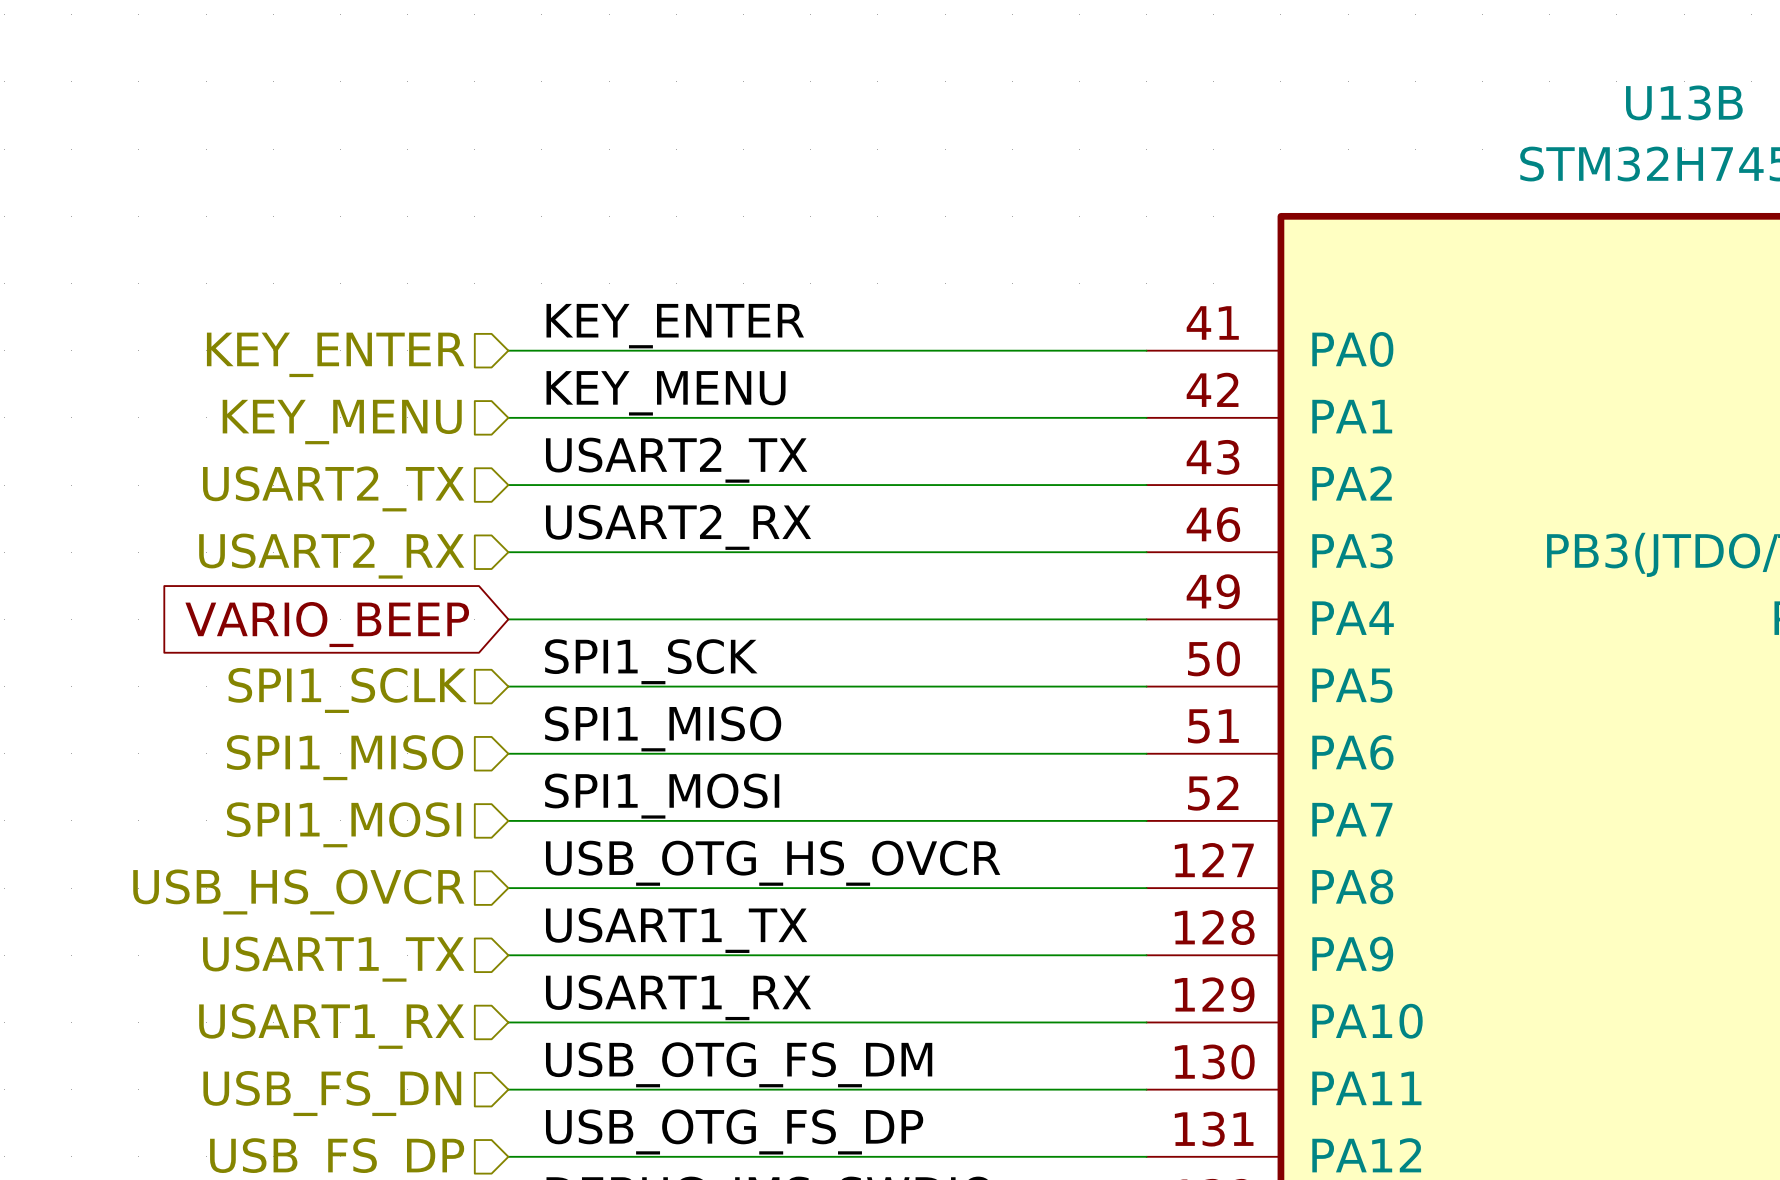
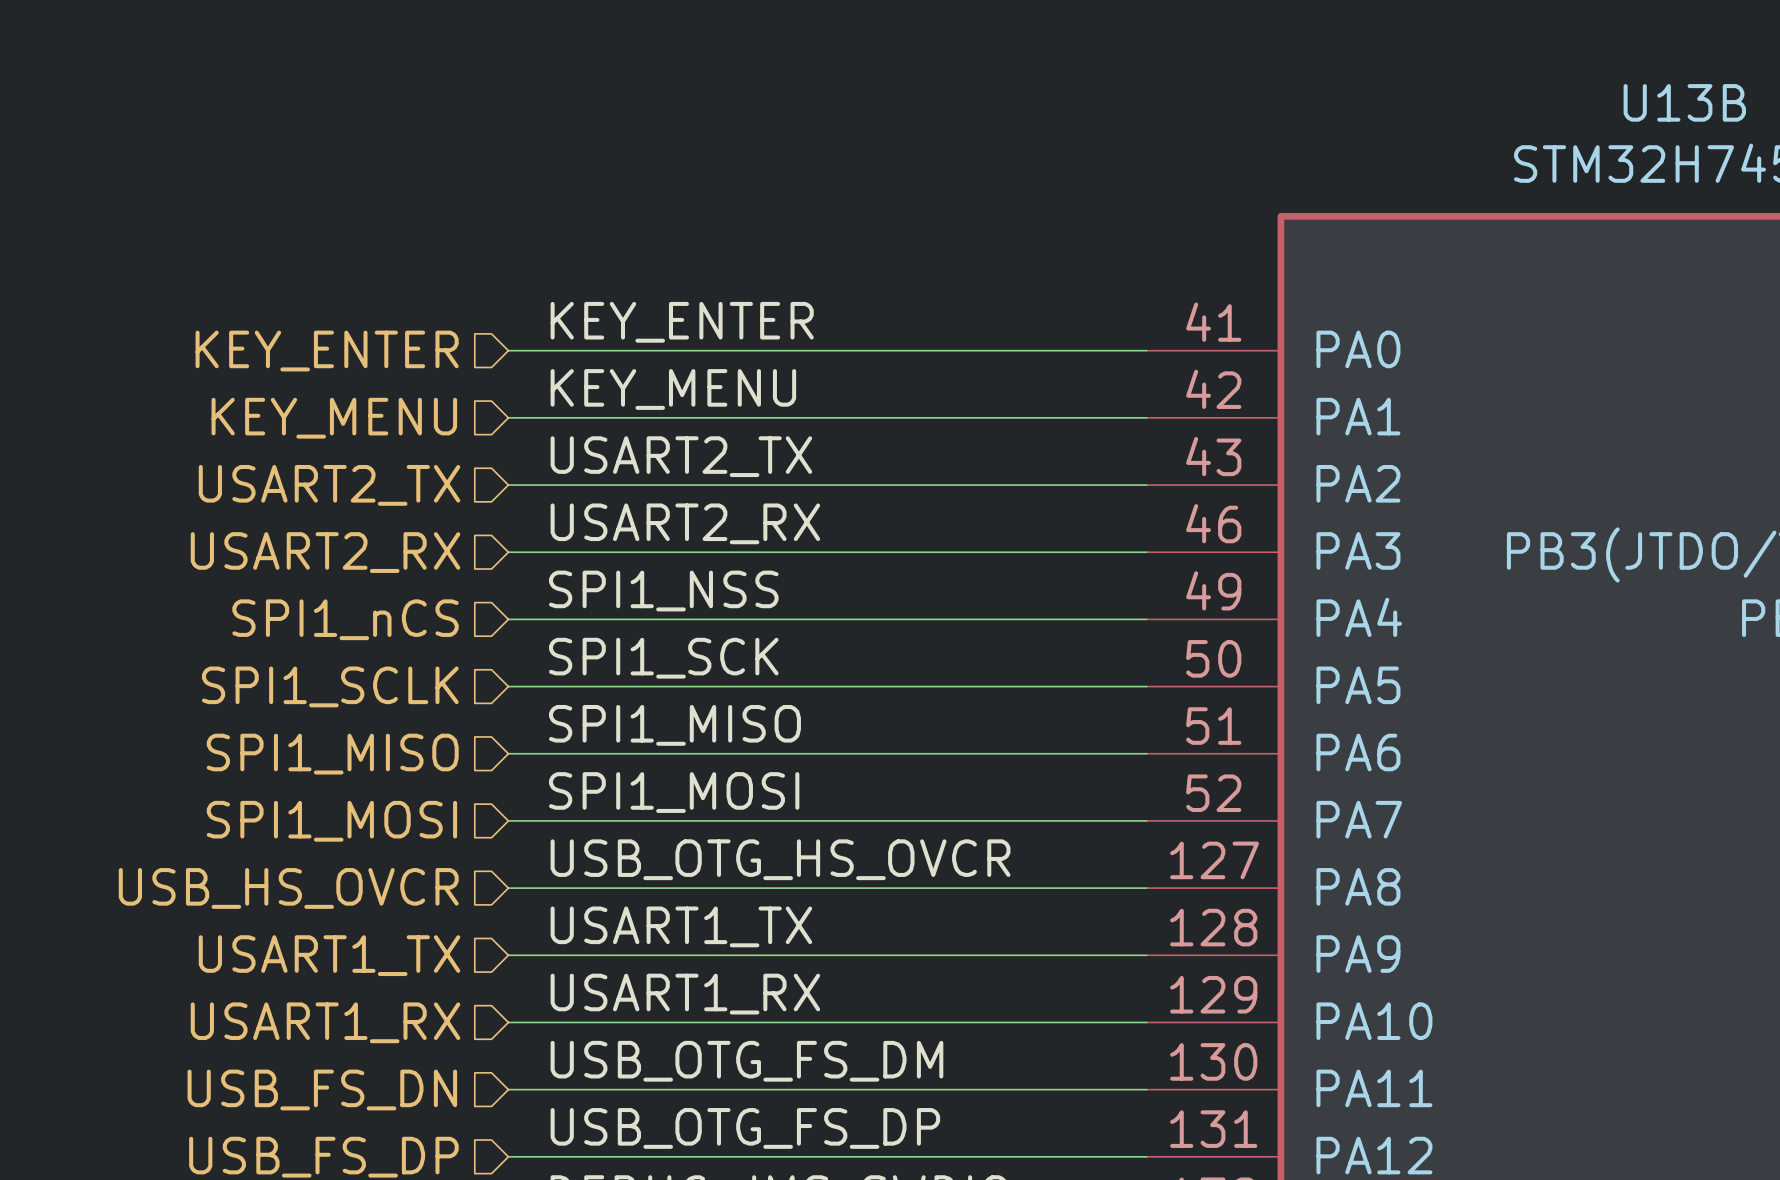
label: none -> SPI1_NSS (663, 591)
hierarchical label: none -> SPI1_nCS (345, 619)
global label: VARIO_BEEP (327, 624) -> none

